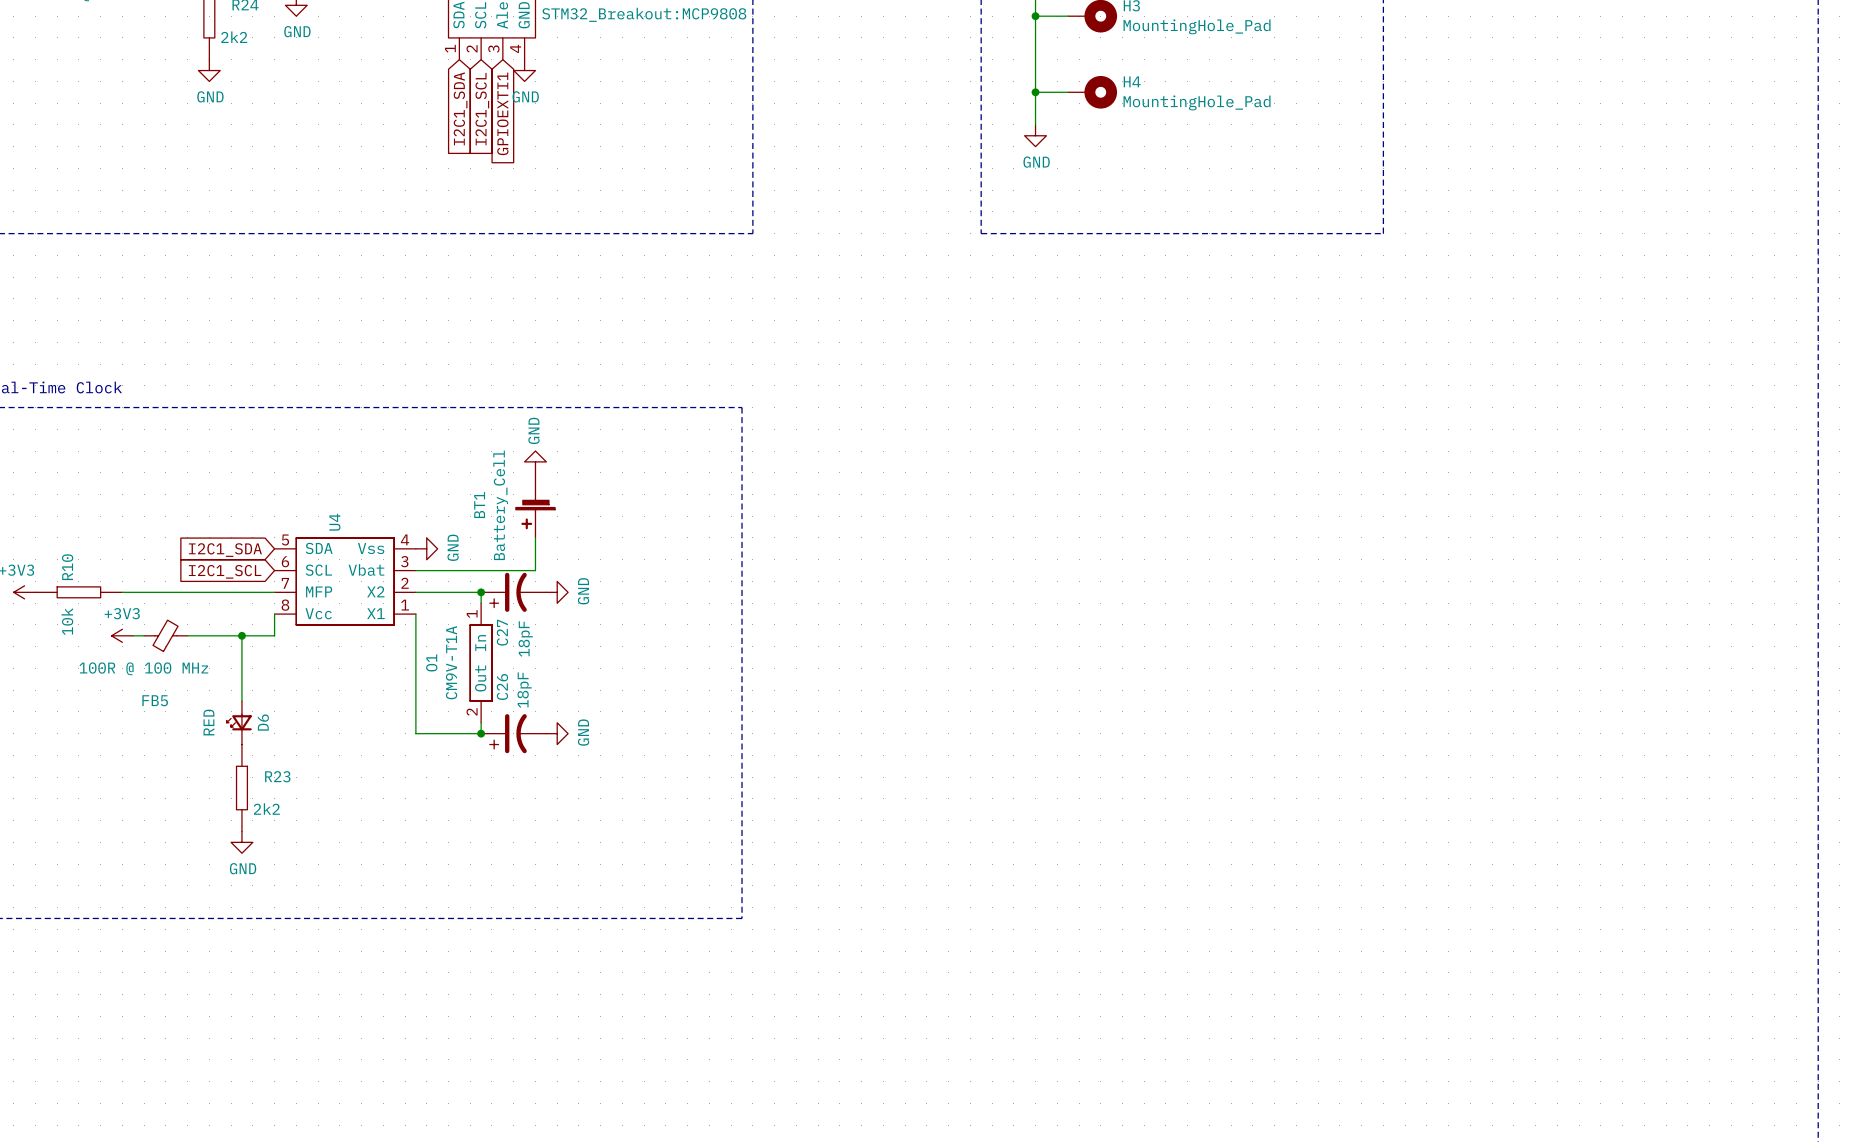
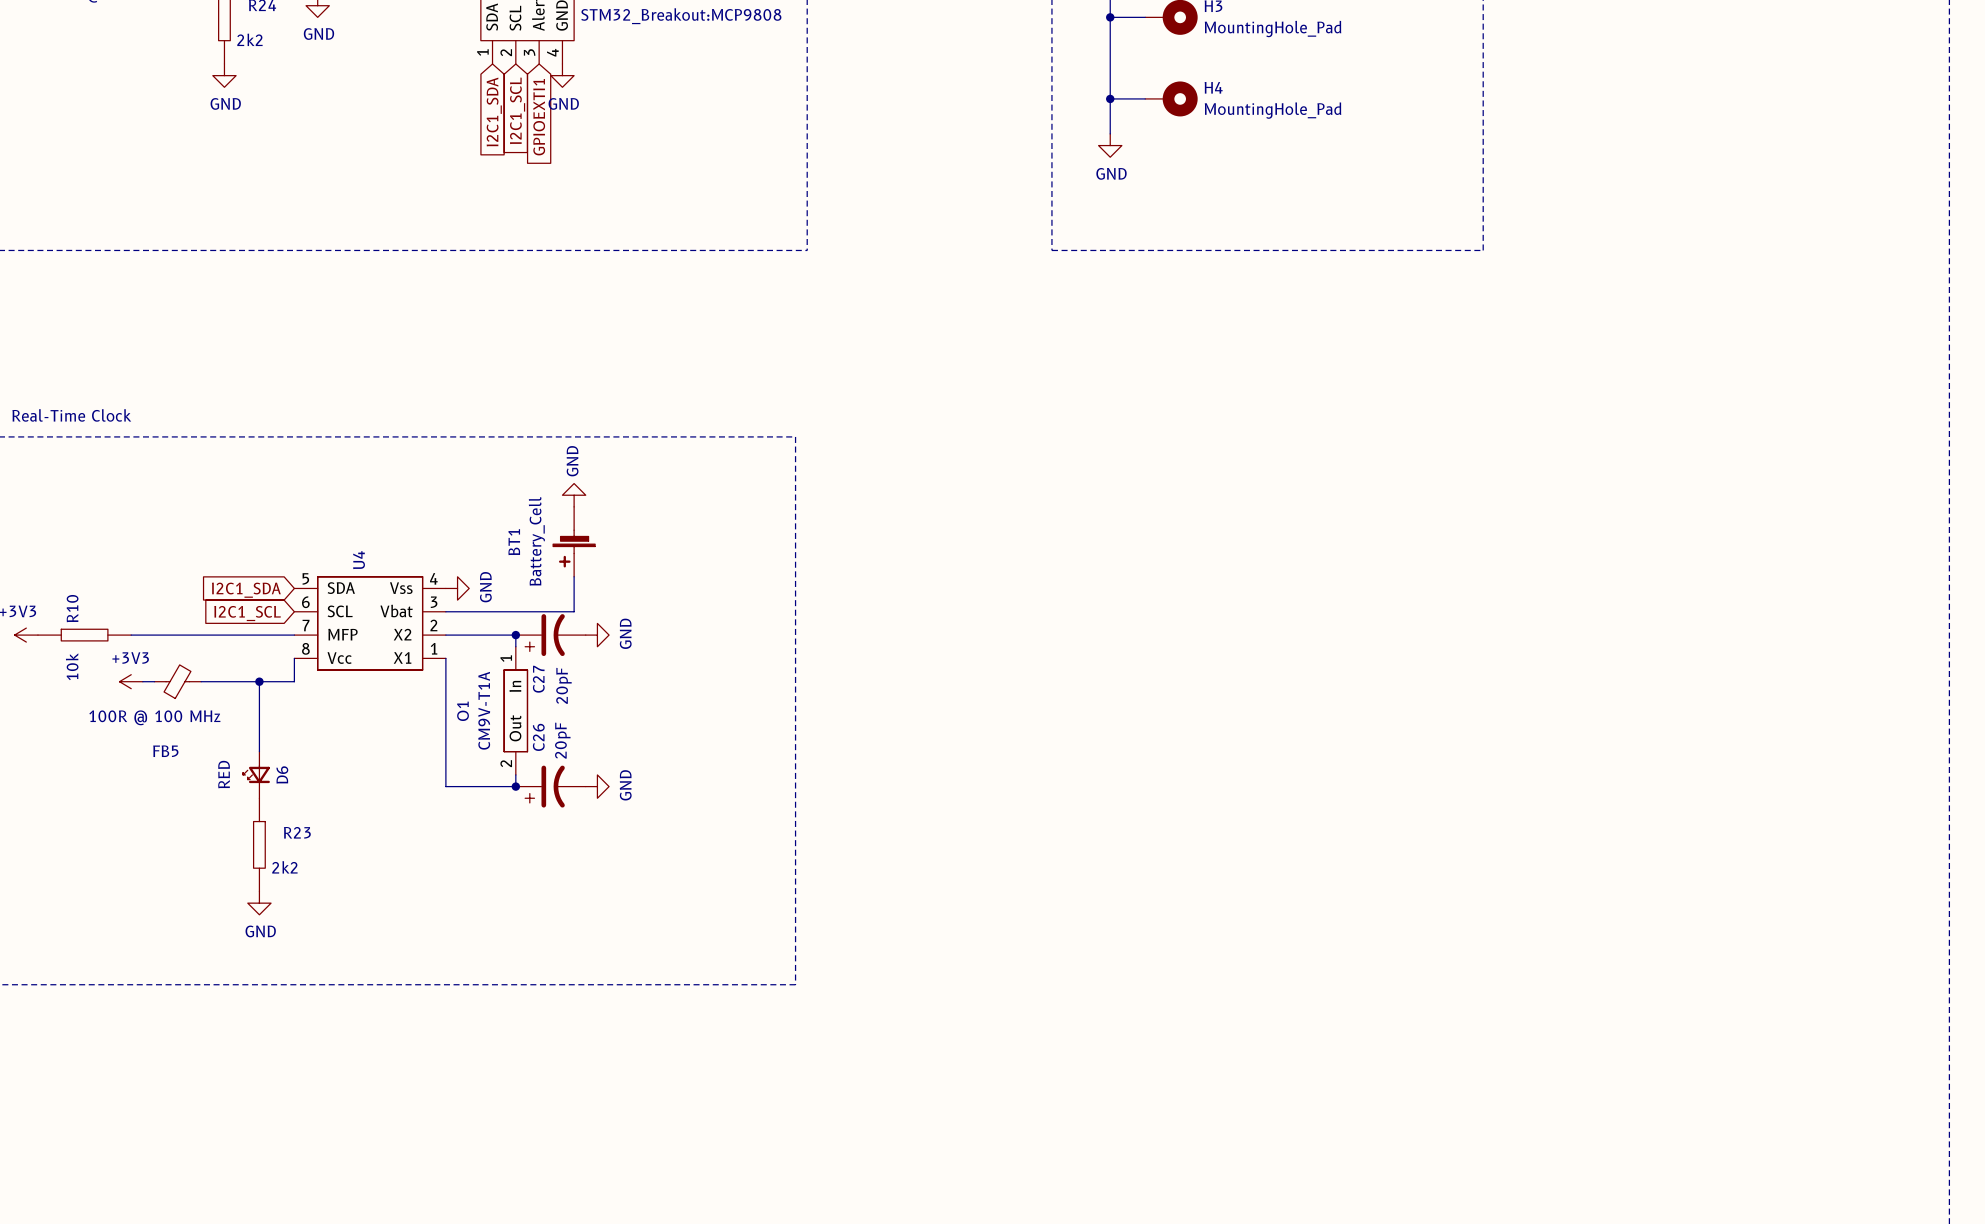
C27 value: 18pF (525, 639) -> 20pF (563, 685)
C26 value: 18pF (524, 690) -> 20pF (562, 740)

